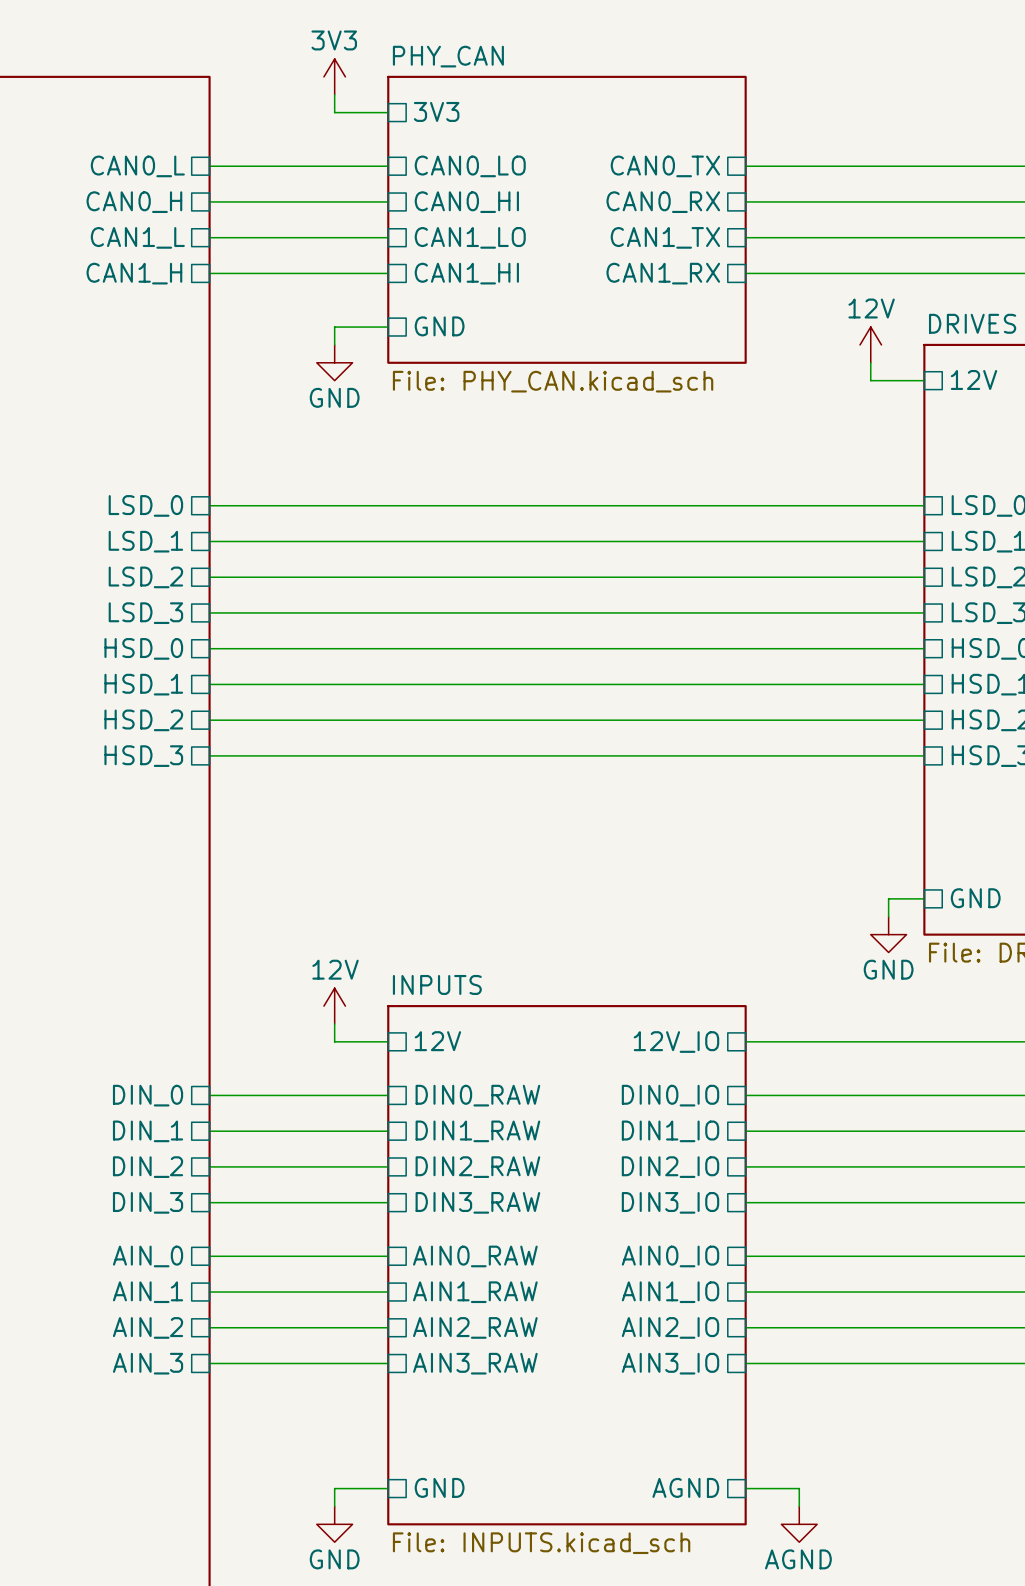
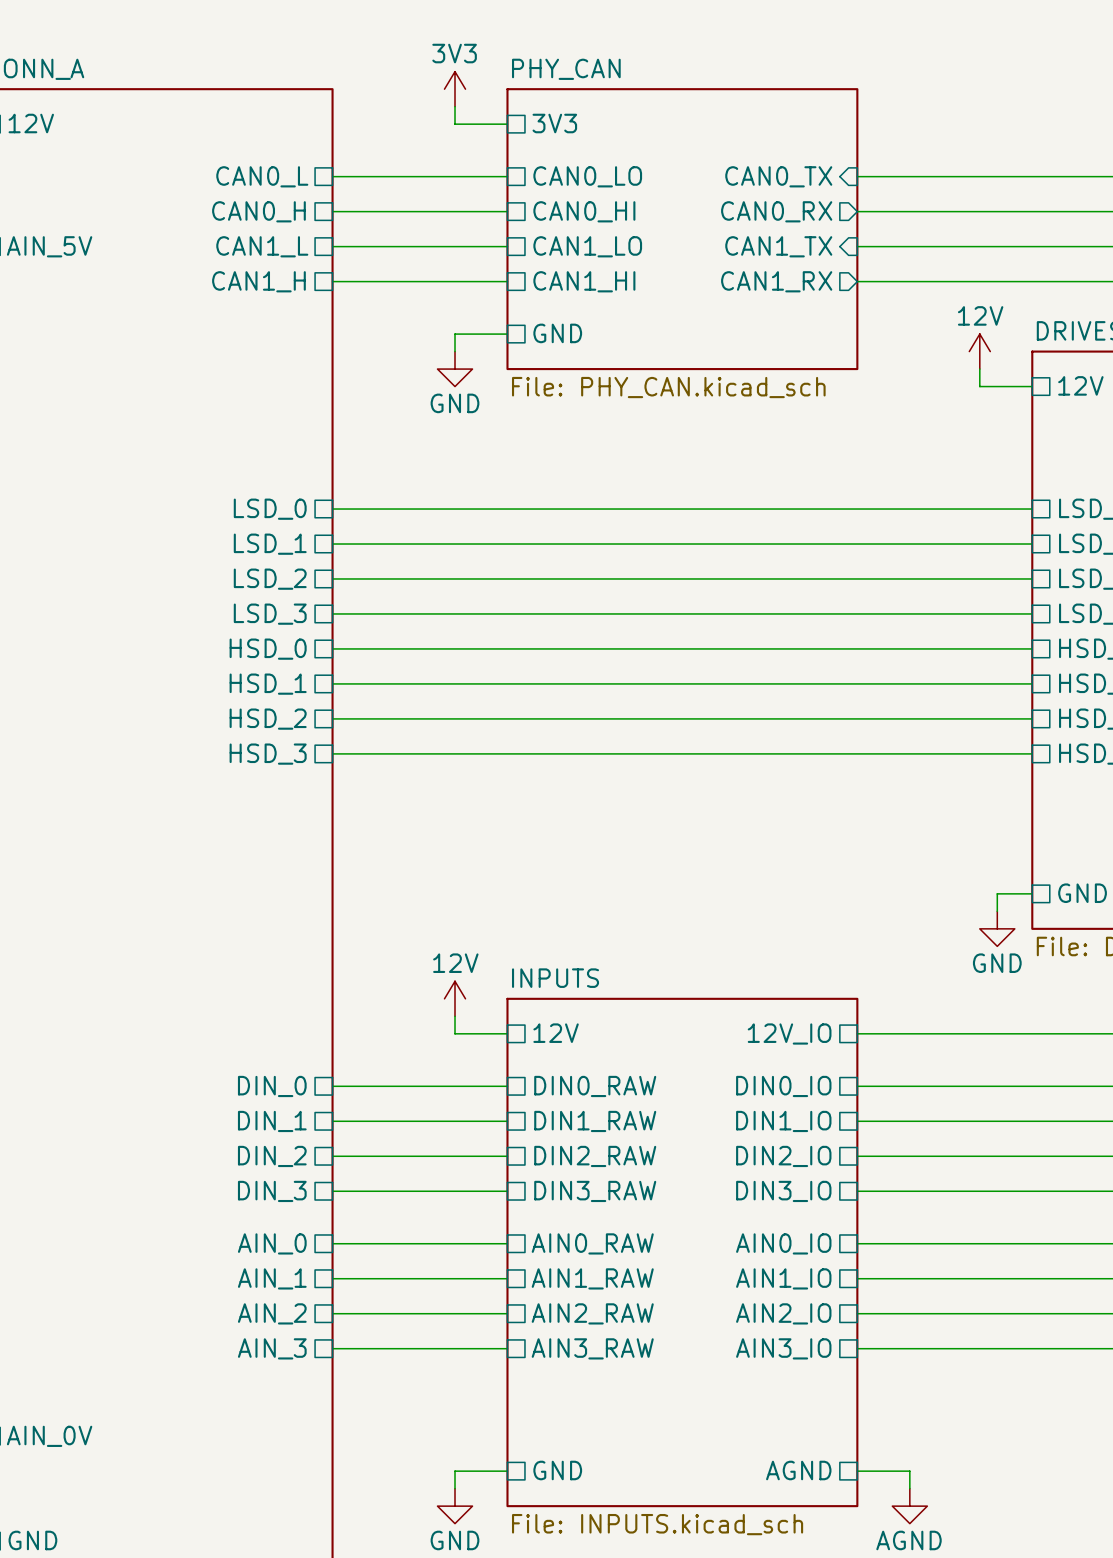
sheet pin shape: passive (665, 166) -> input (778, 176)
sheet pin shape: passive (663, 202) -> output (776, 211)
sheet pin shape: passive (665, 237) -> input (778, 246)
sheet pin shape: passive (663, 273) -> output (776, 281)

